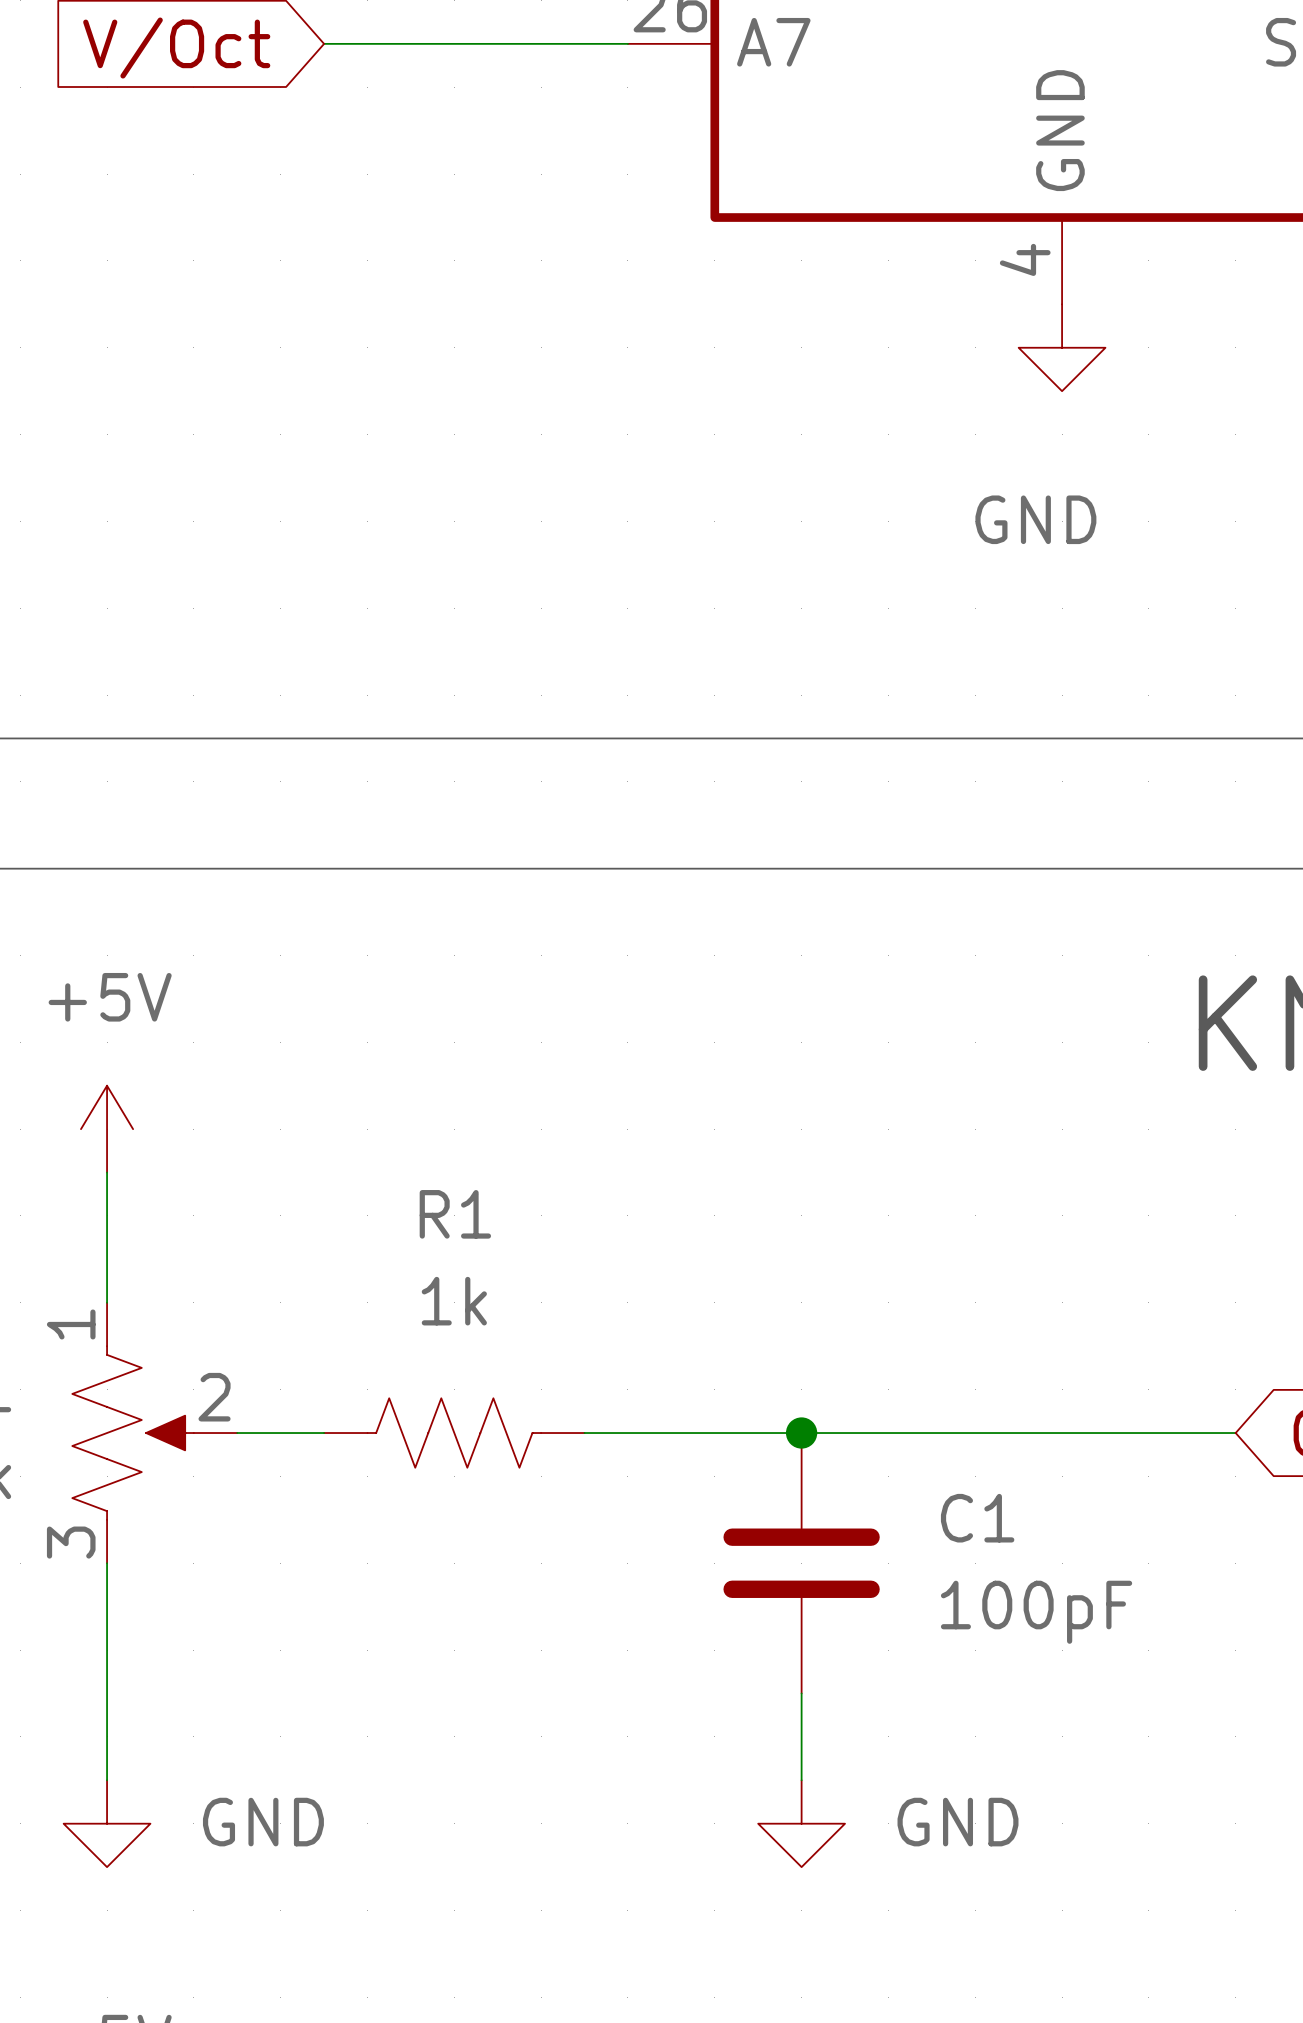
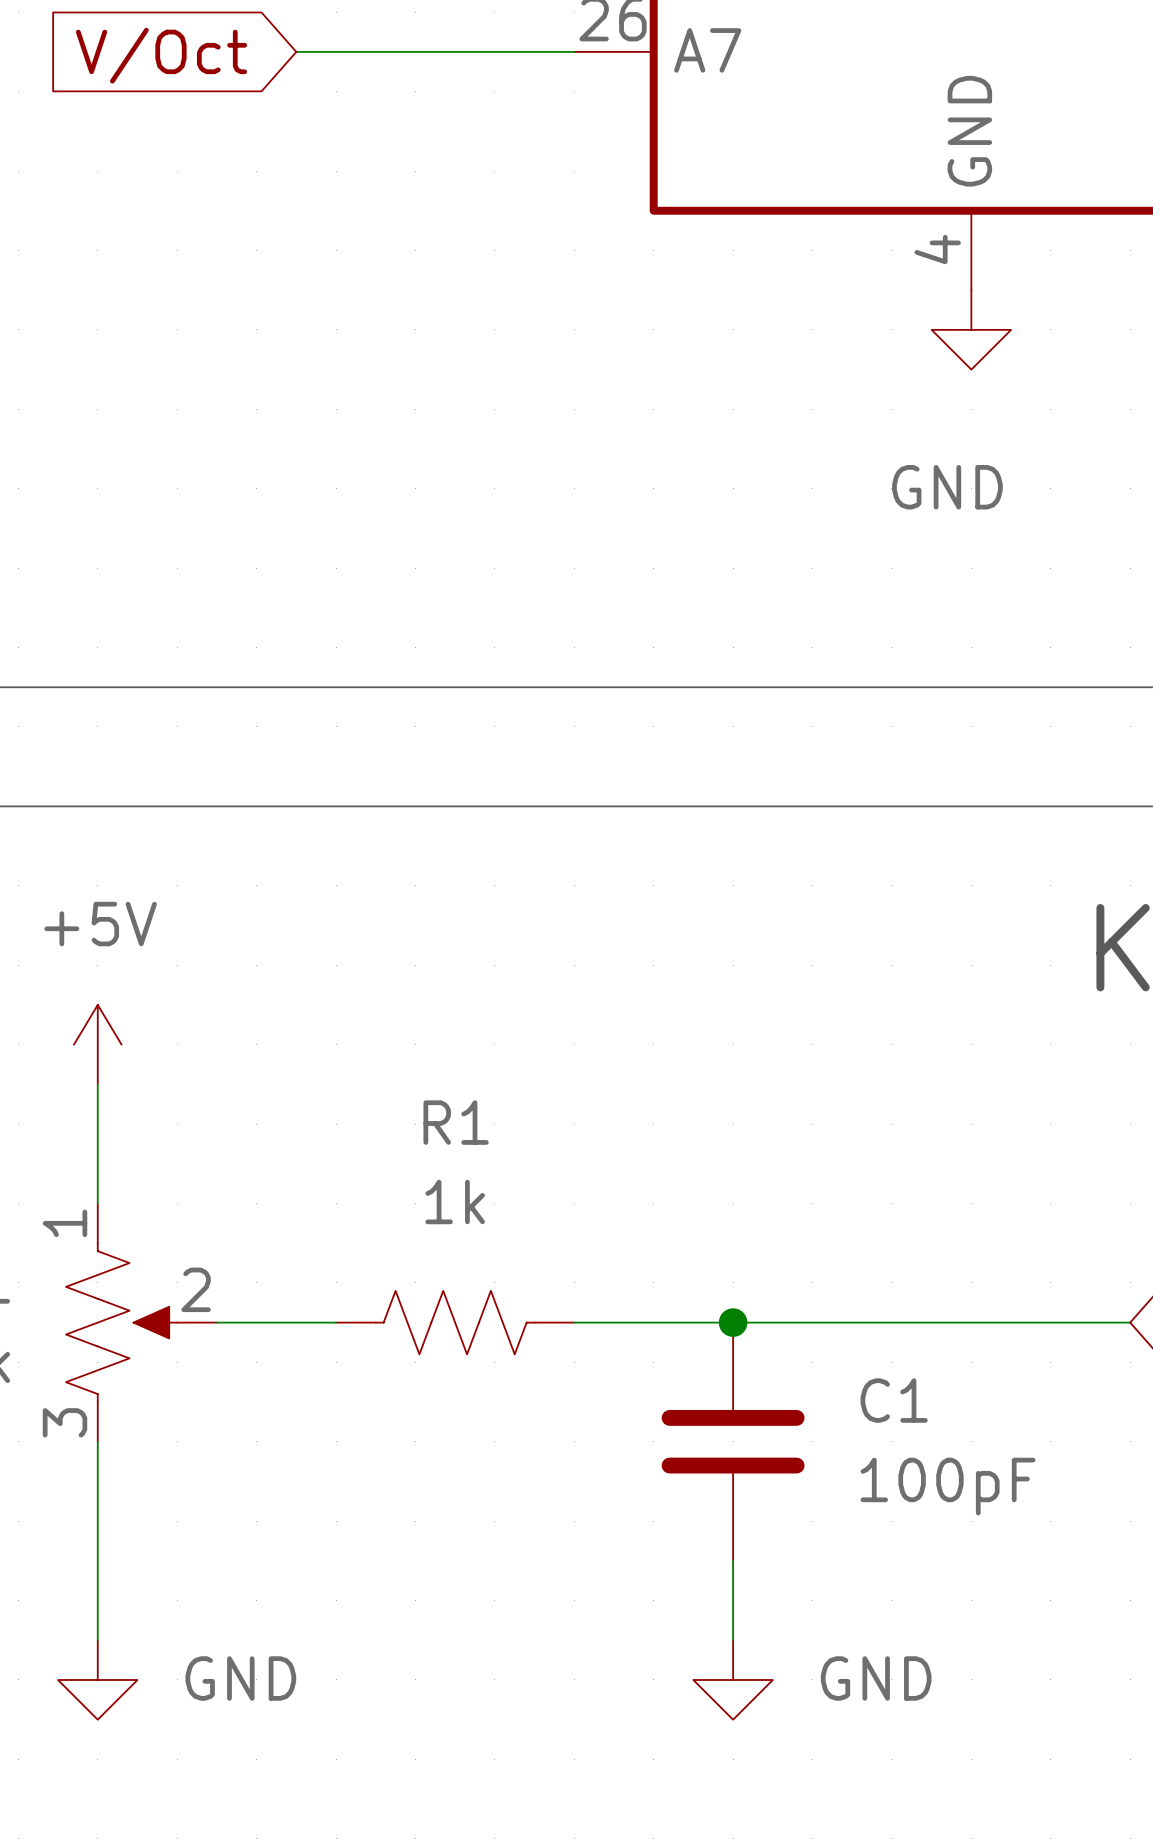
R1 position: (454, 1433) -> (455, 1322)

